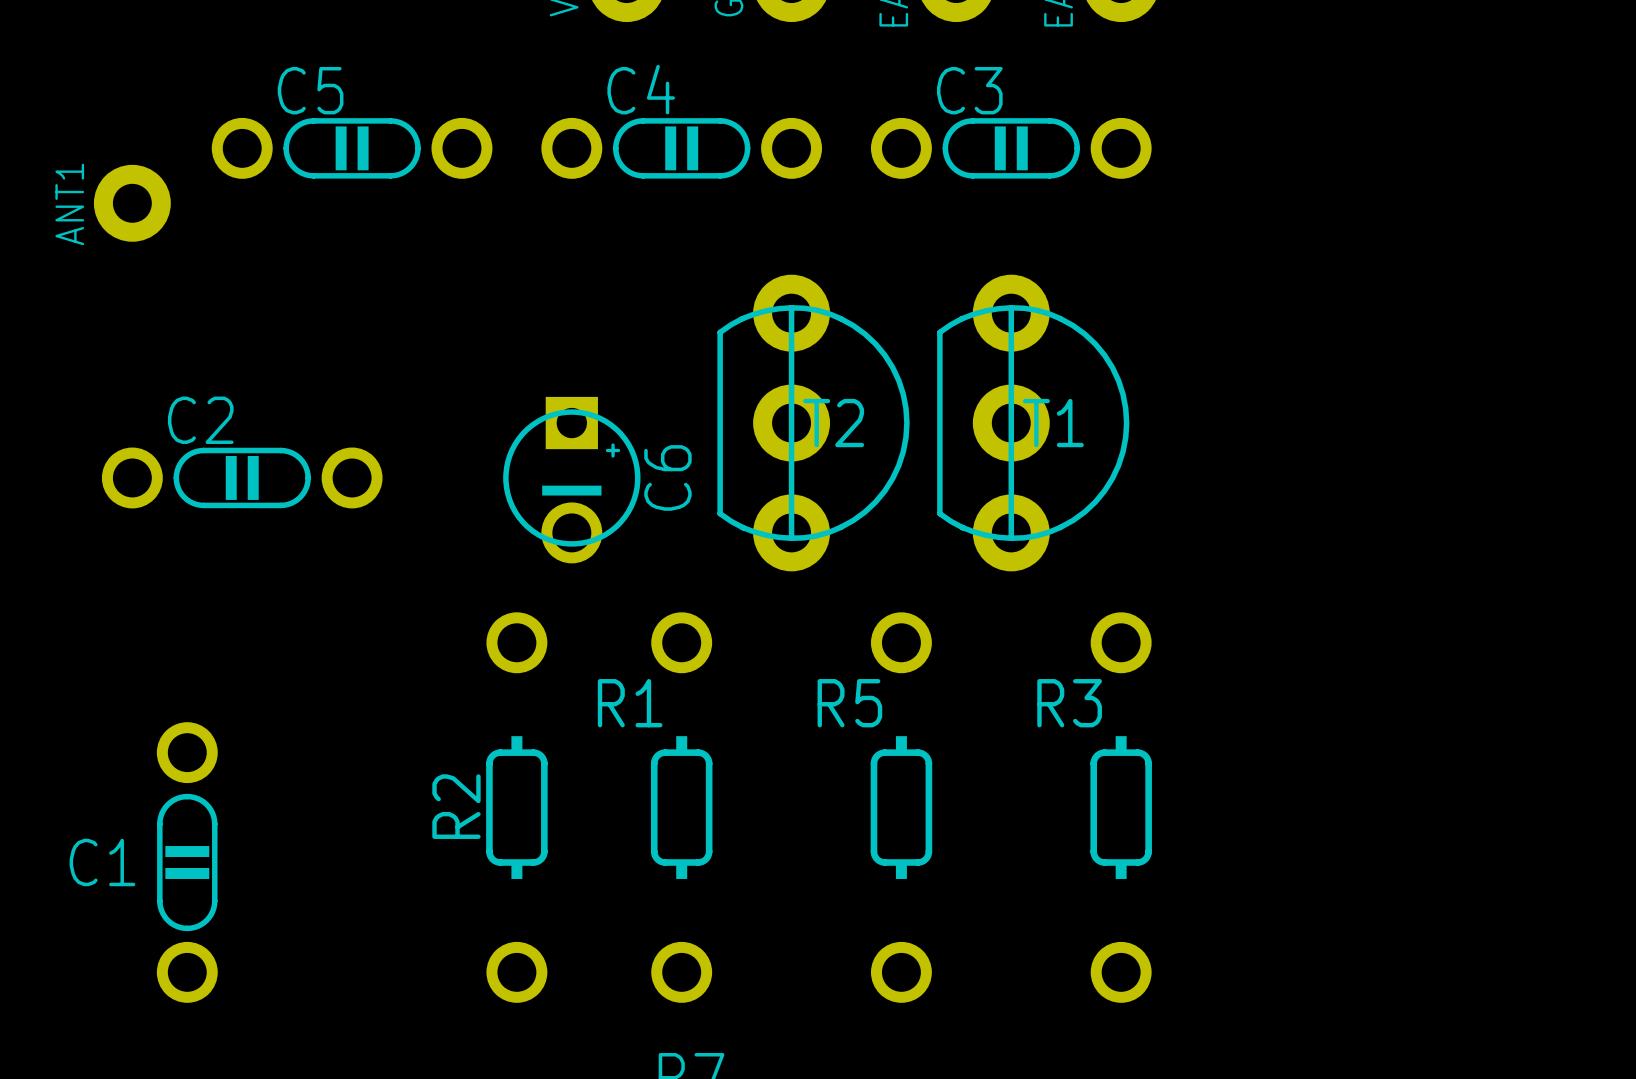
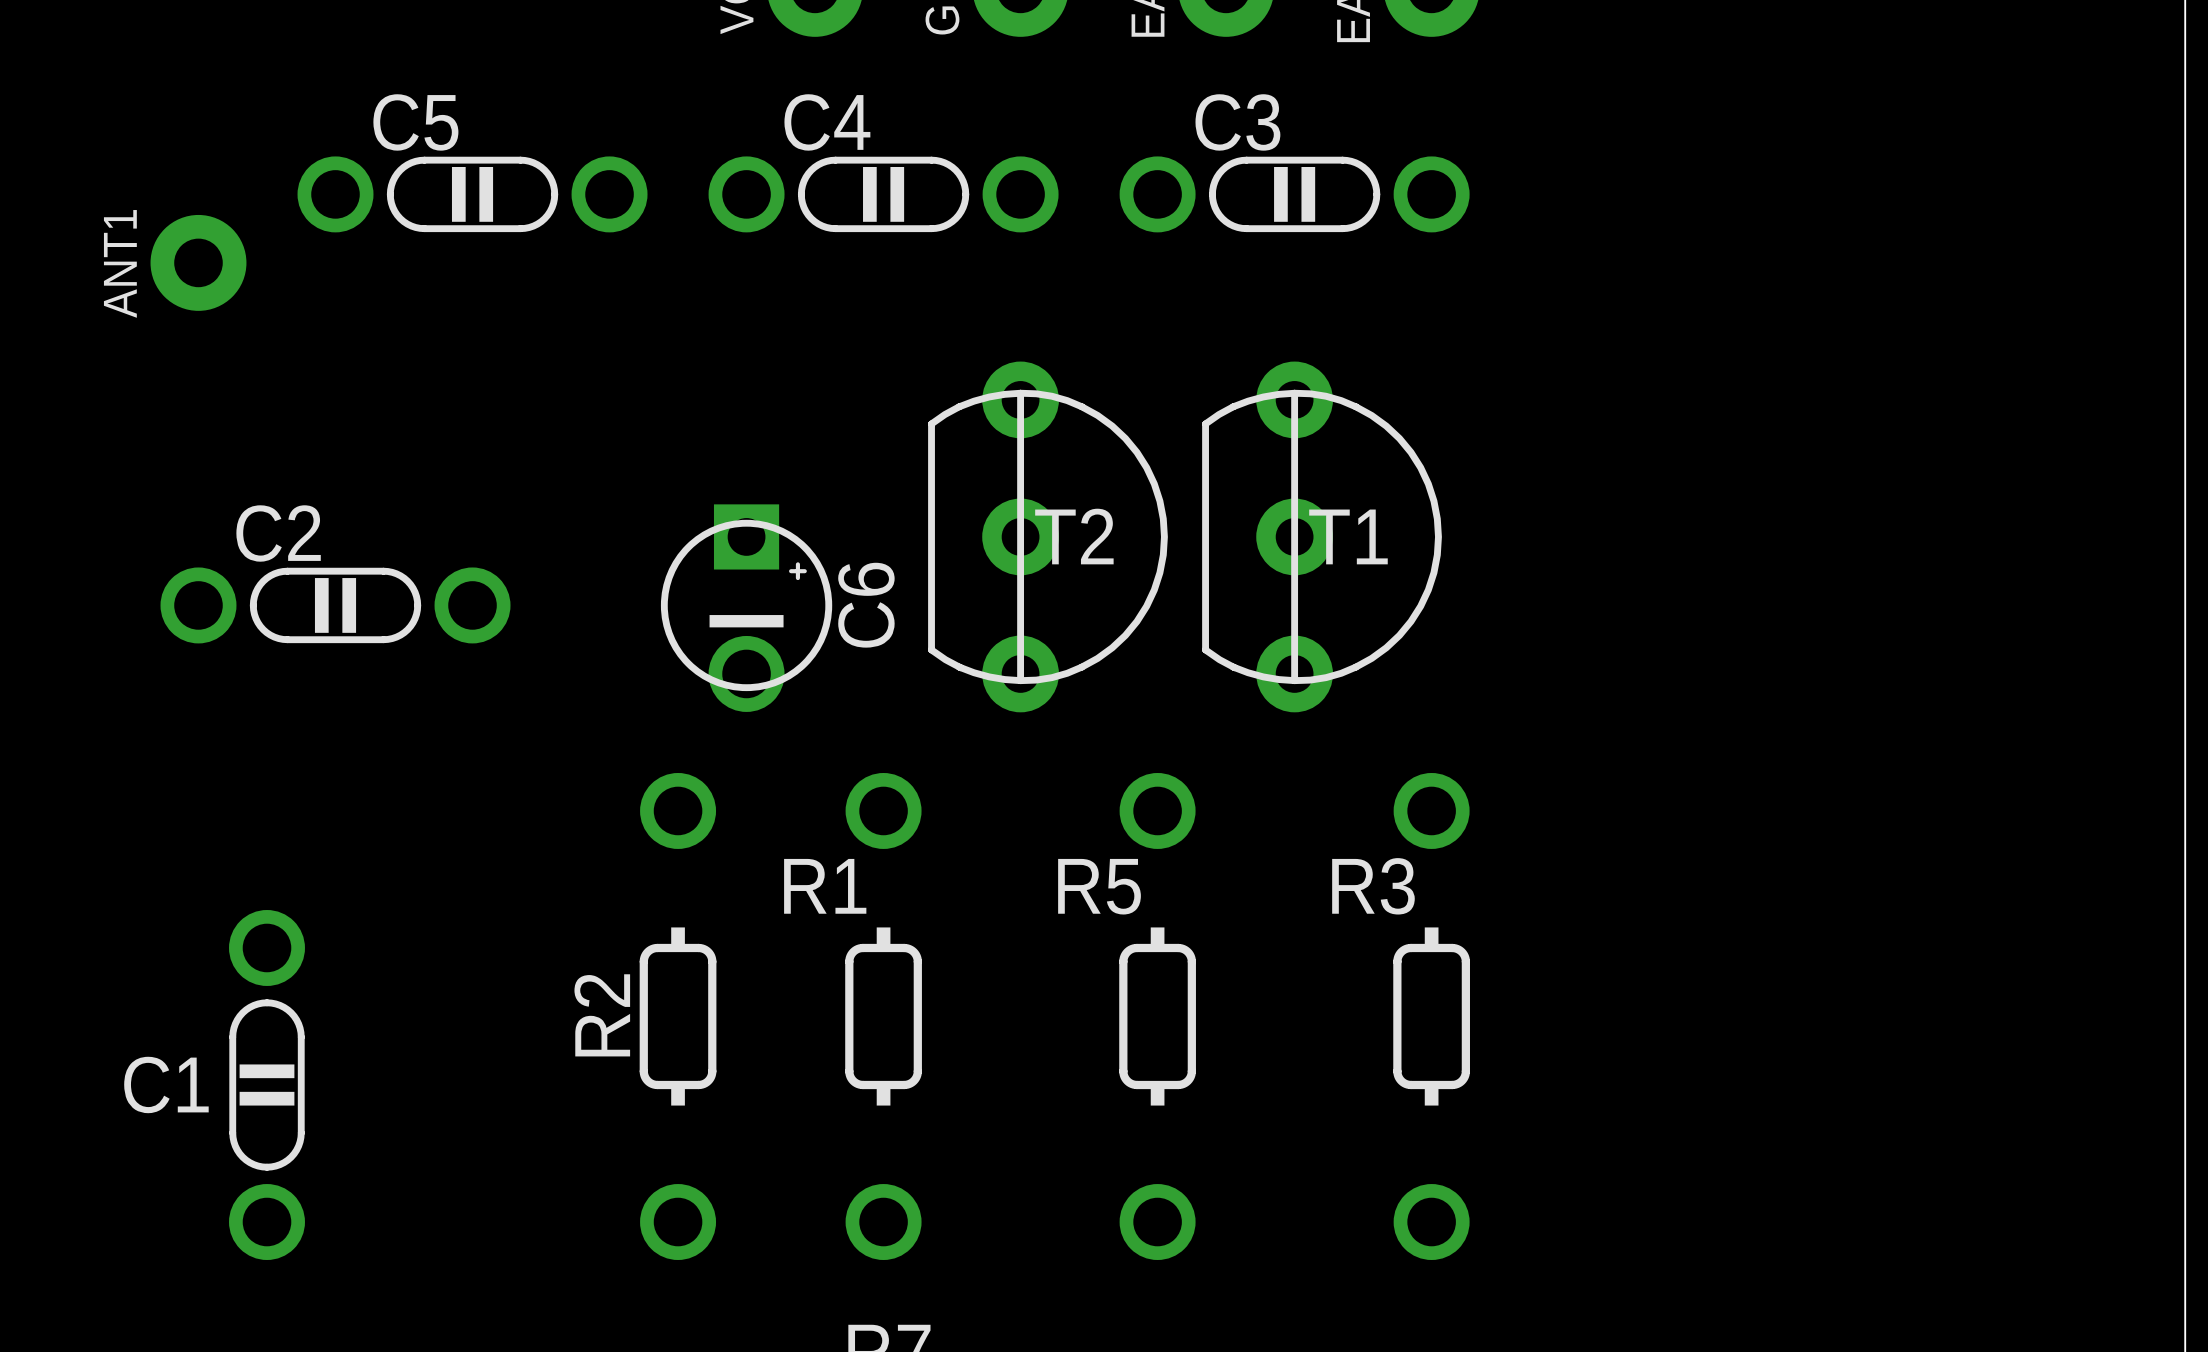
T2 footprint: [717, 274, 910, 572] -> [928, 361, 1168, 713]
T1 footprint: [937, 274, 1130, 572] -> [1202, 361, 1442, 713]

